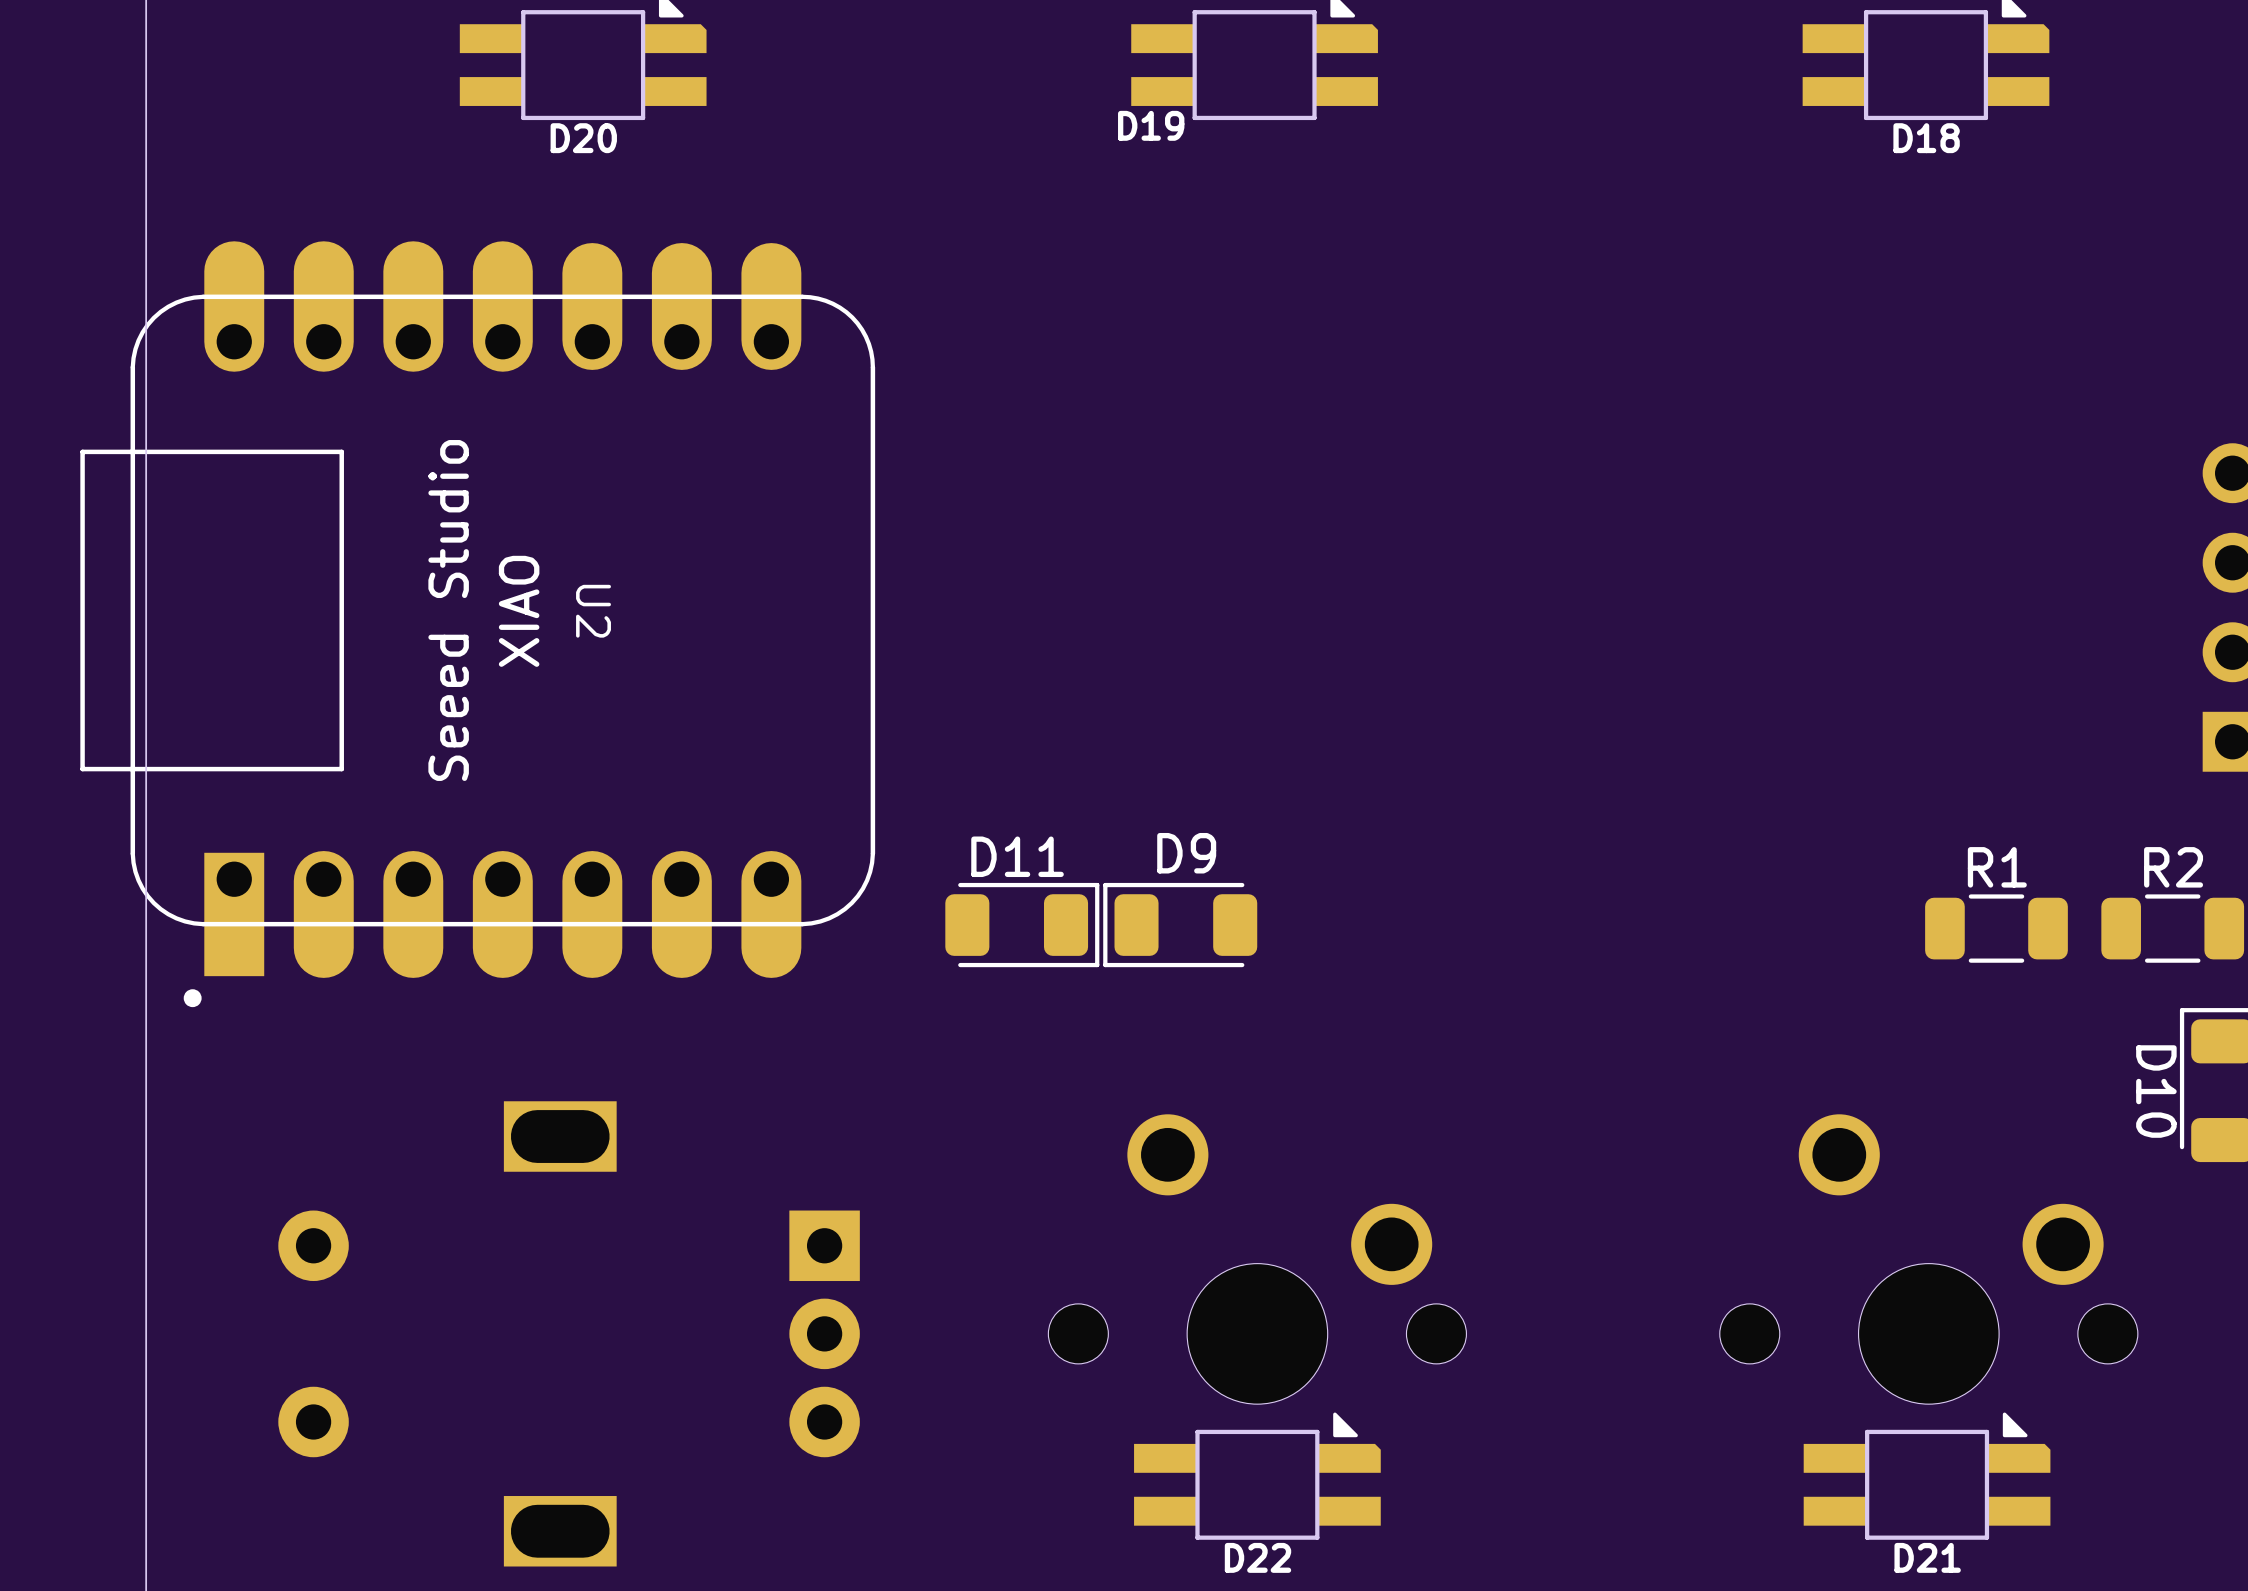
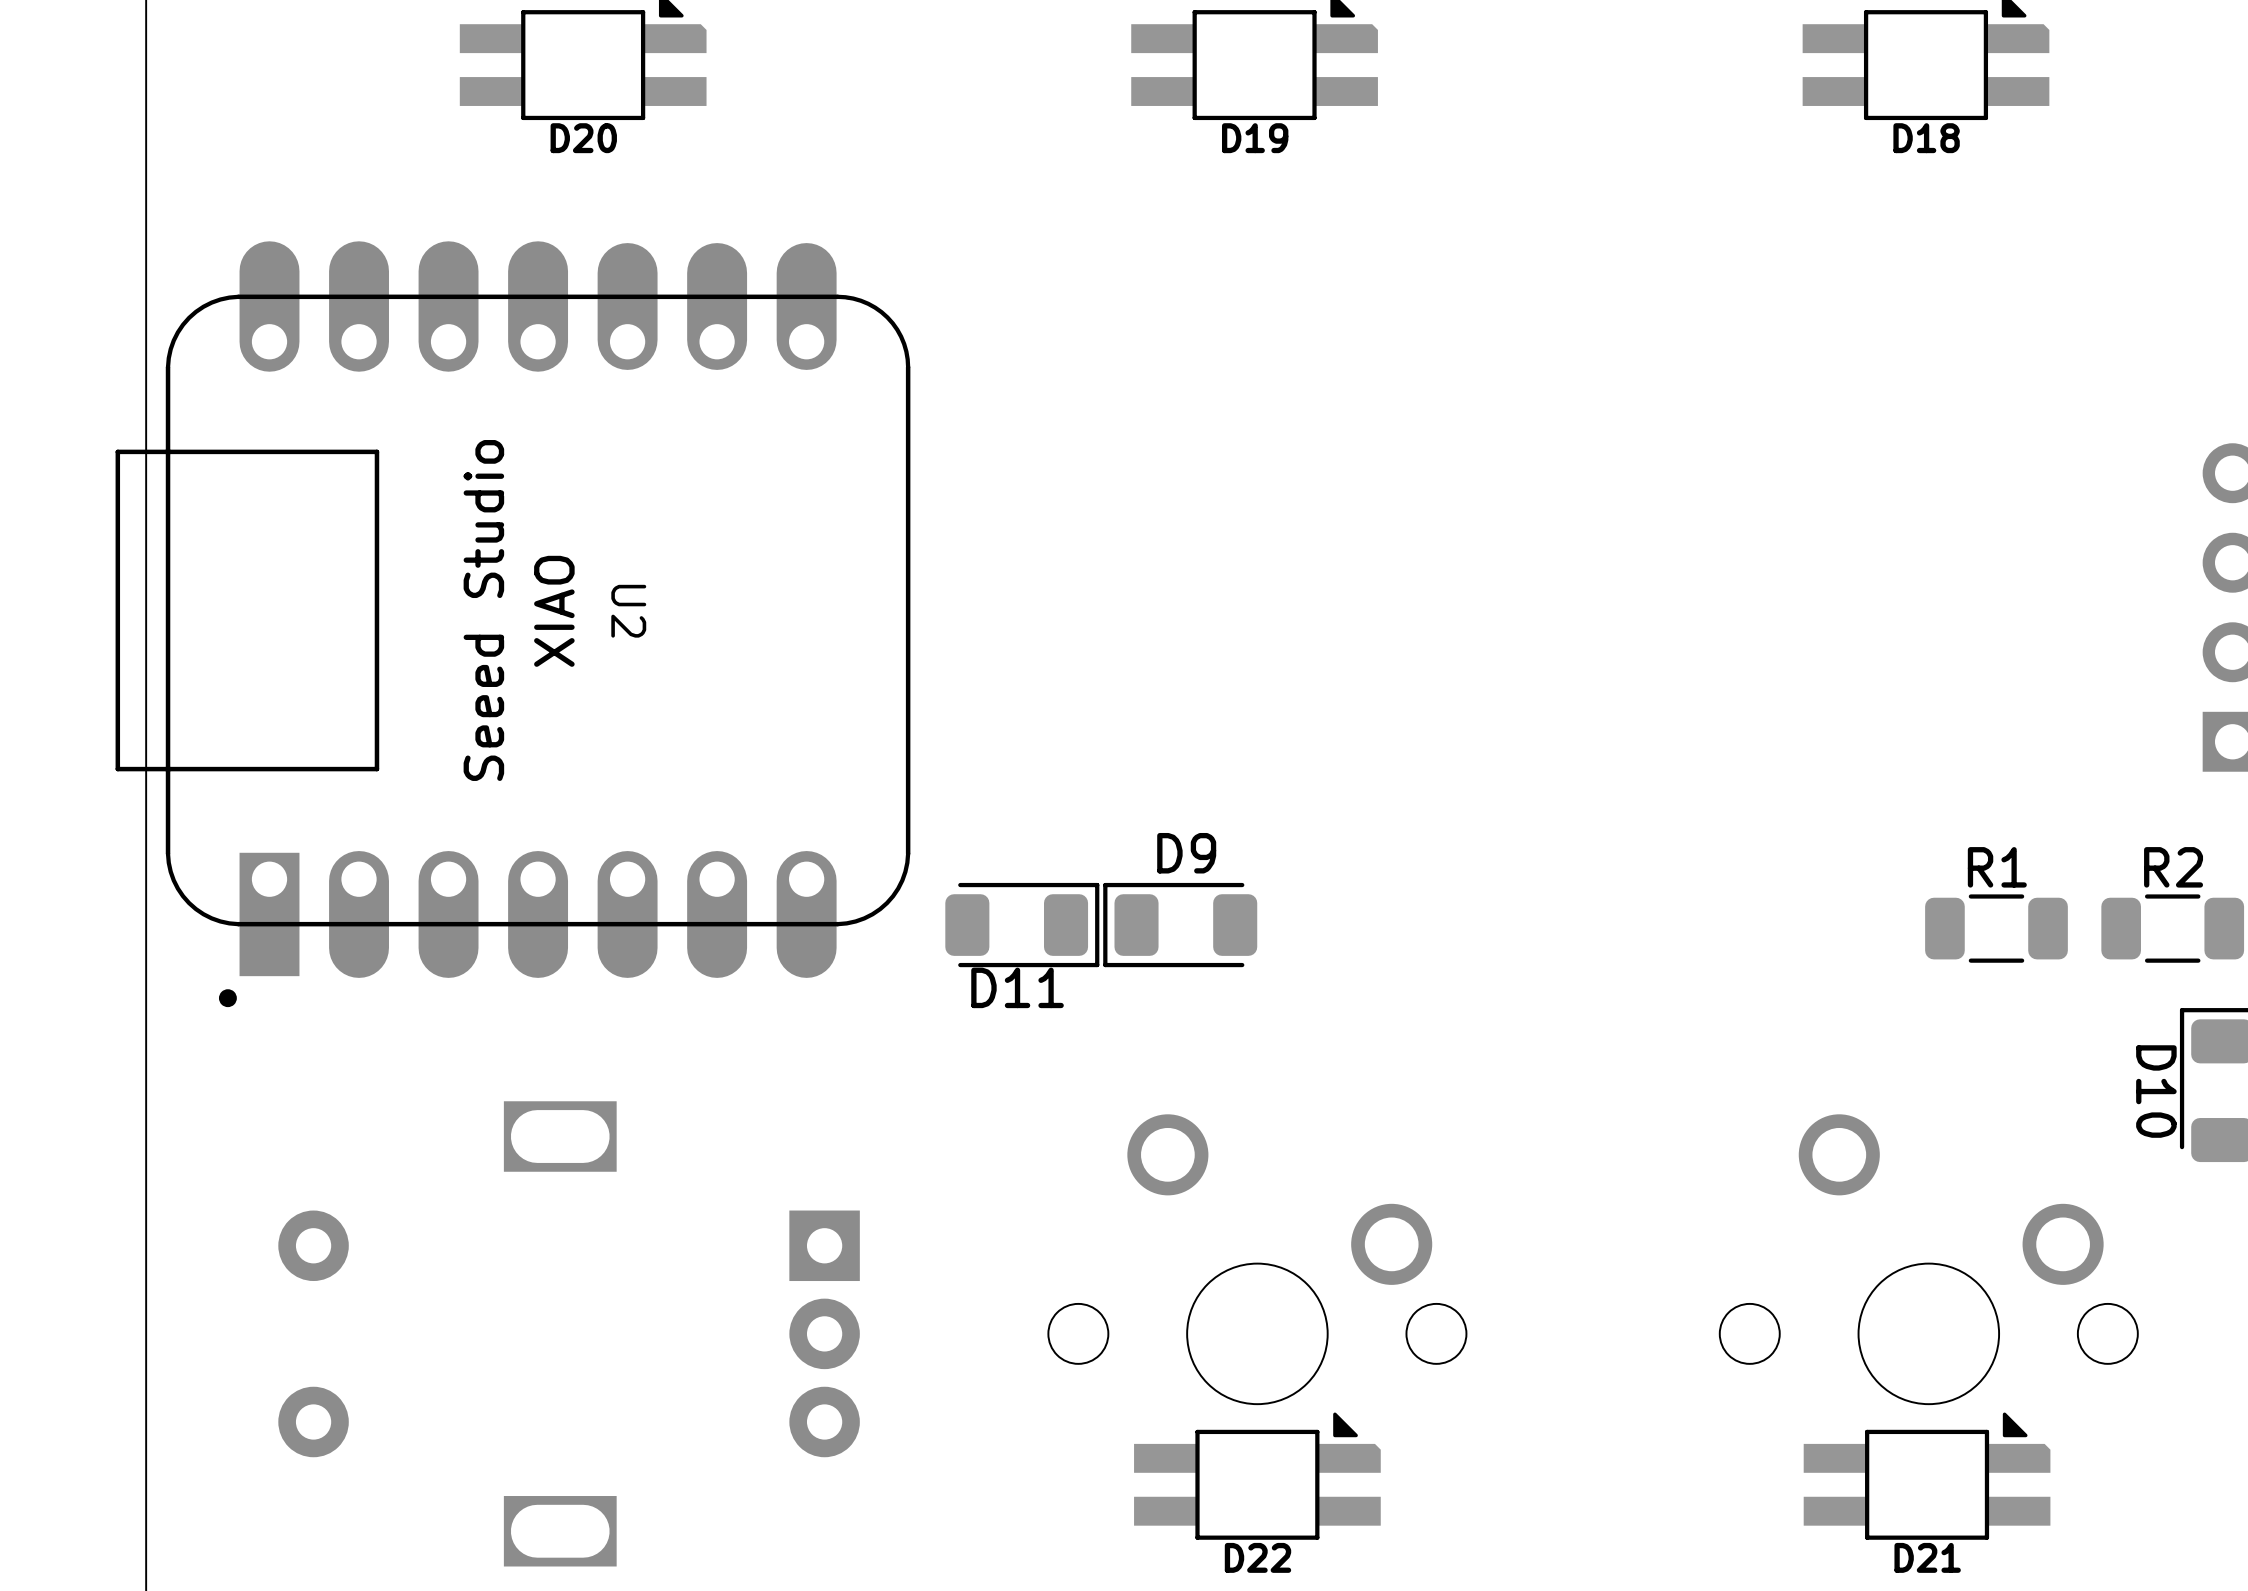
D19 name position: D19 (1151, 125) -> D19 (1255, 138)
U2 position: (477, 624) -> (512, 624)
D11 name position: D11 (1017, 856) -> D11 (1017, 987)

